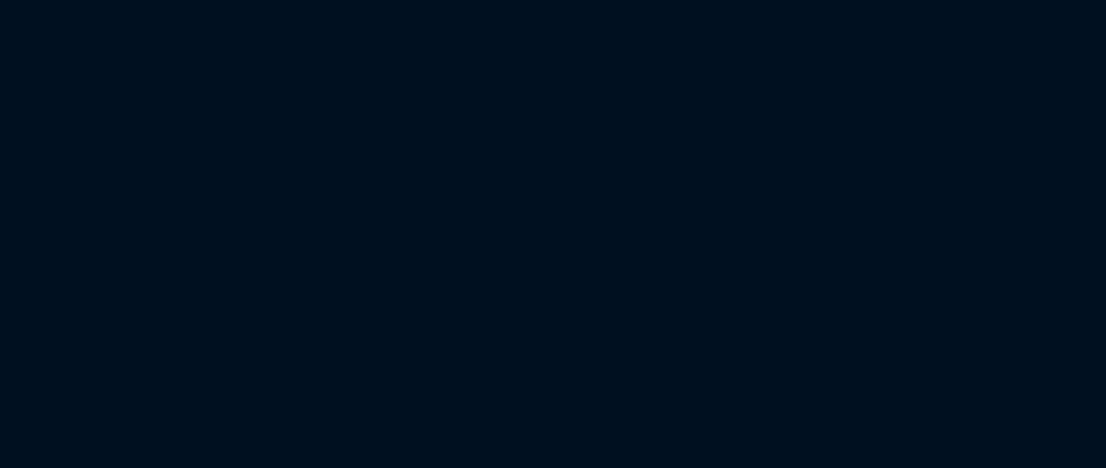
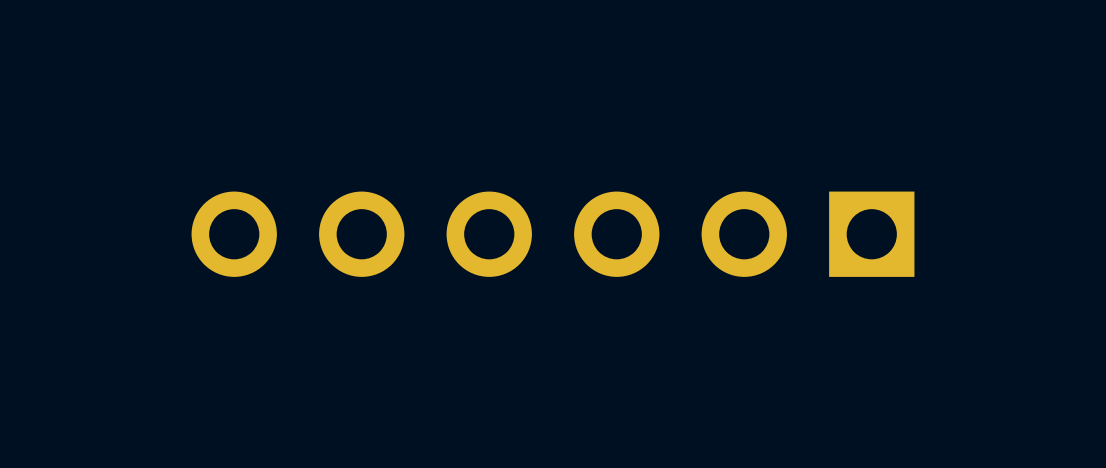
part: none -> (553, 234)

